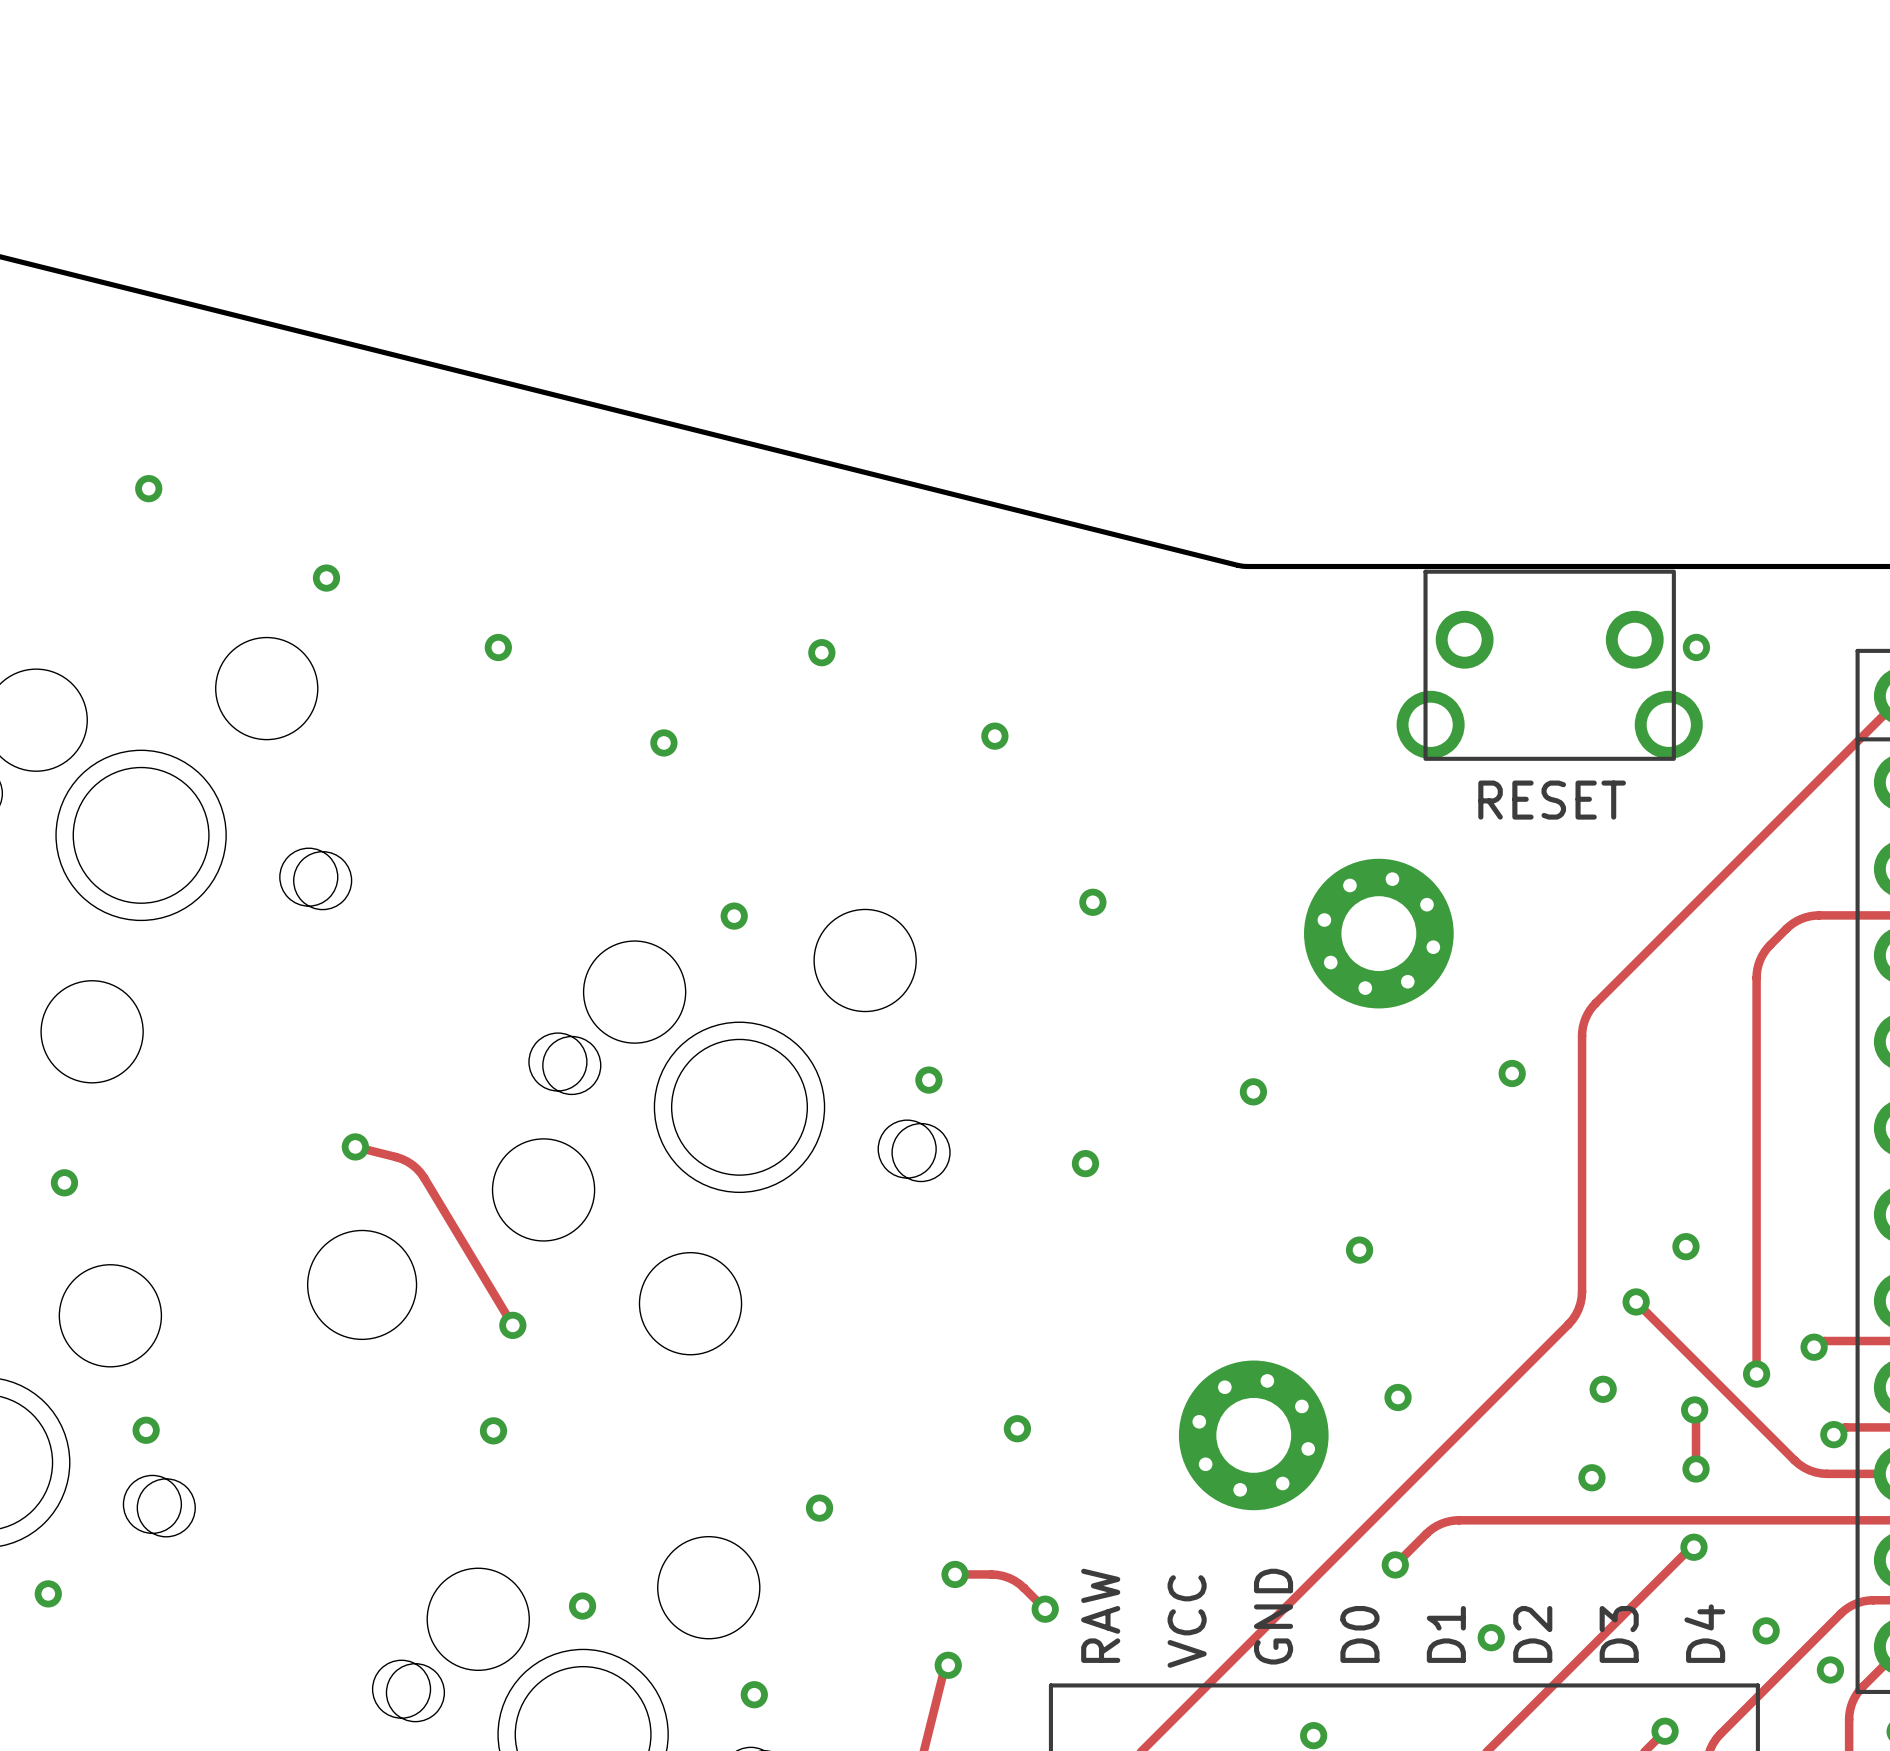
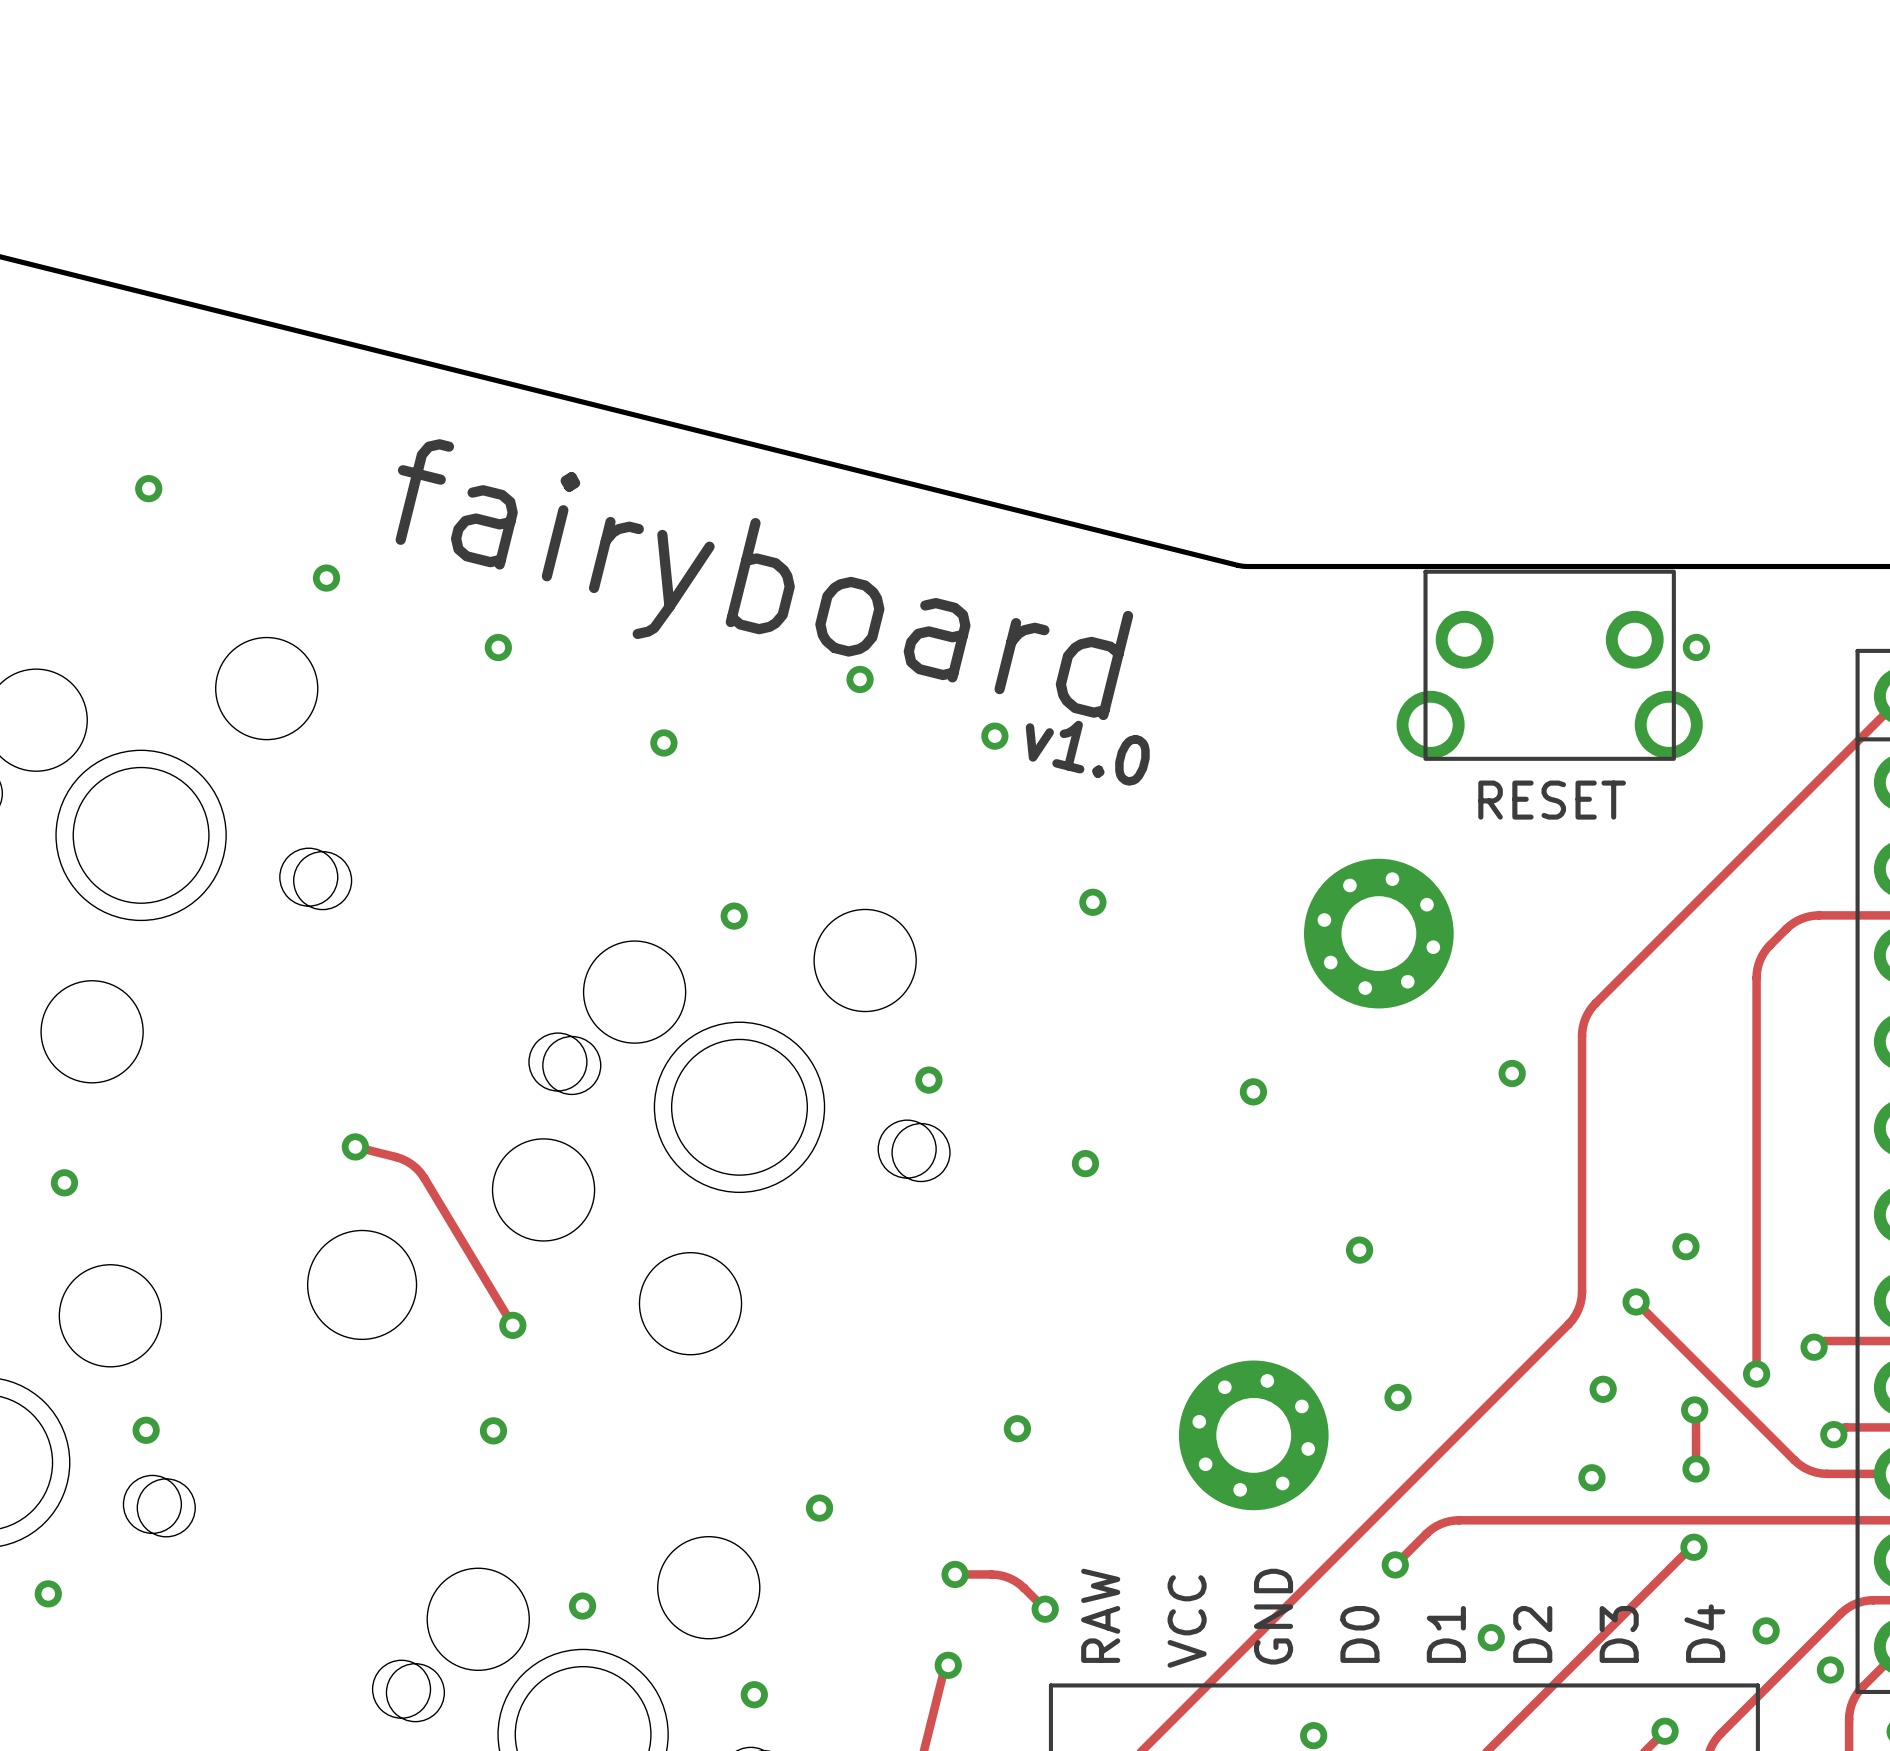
text: none -> fairyboard (764, 579)
via position: (821, 652) -> (860, 679)
text: none -> v1.0 (1087, 753)

